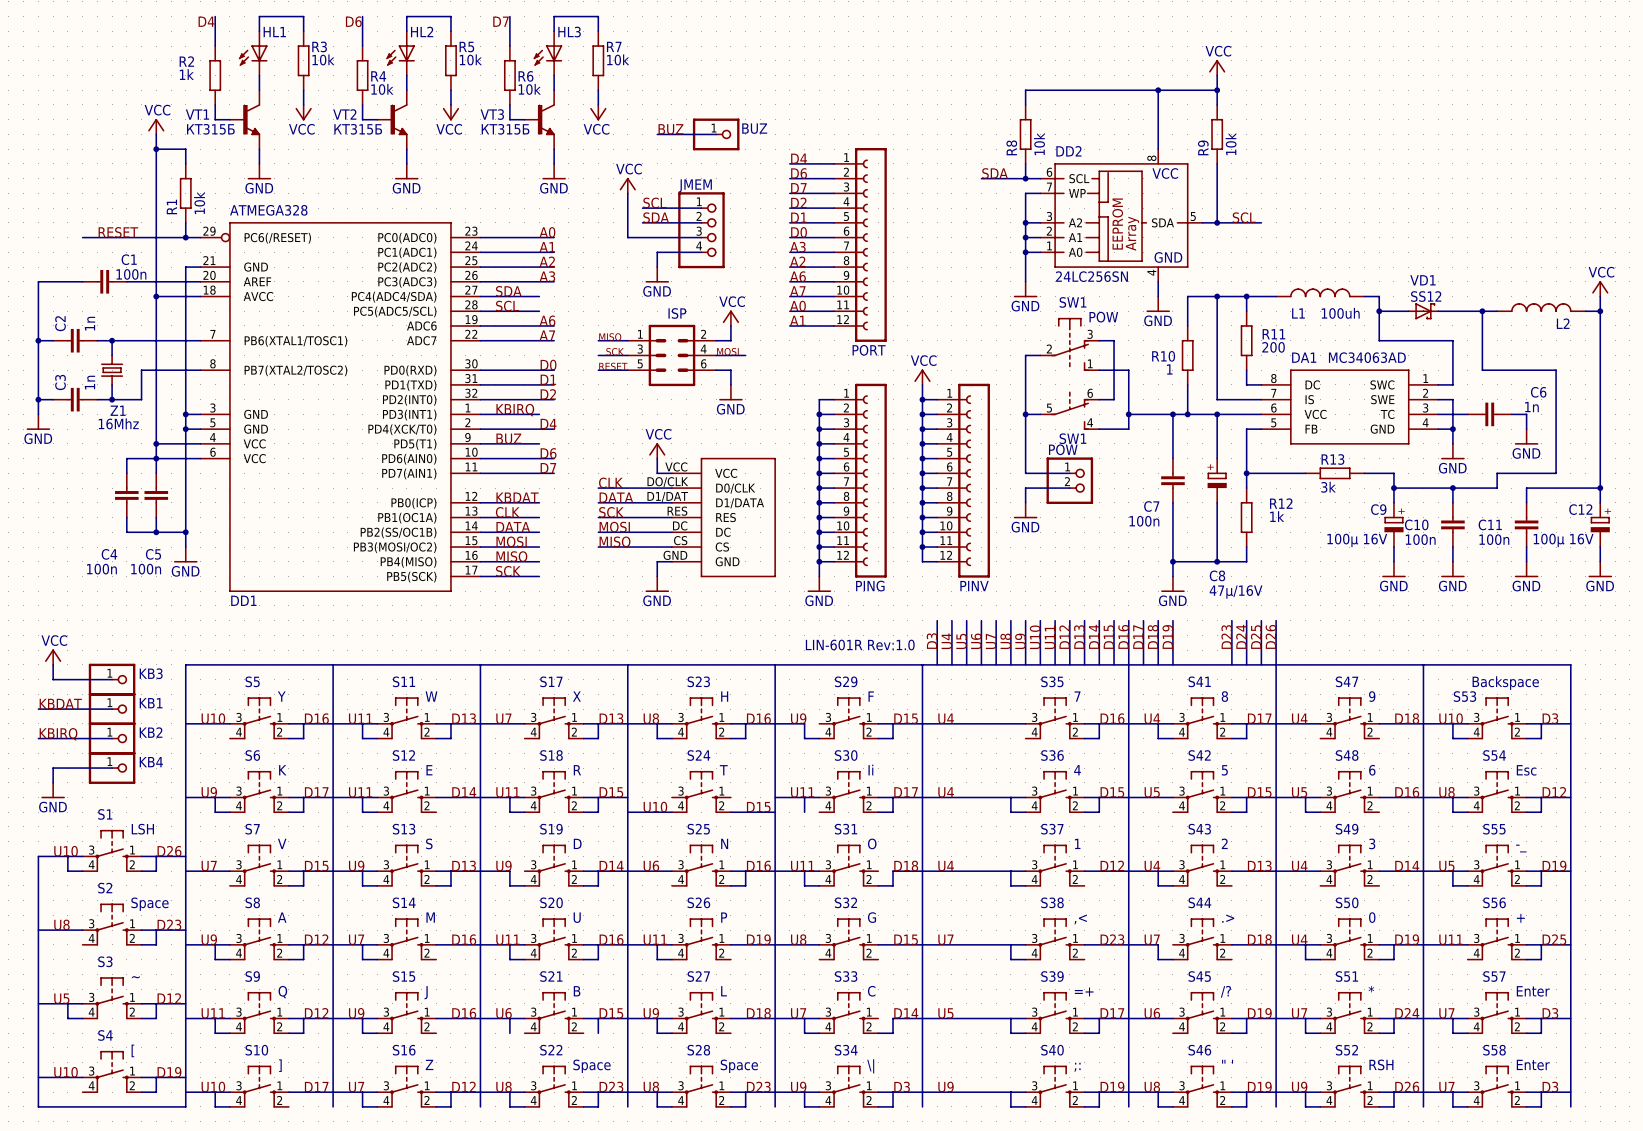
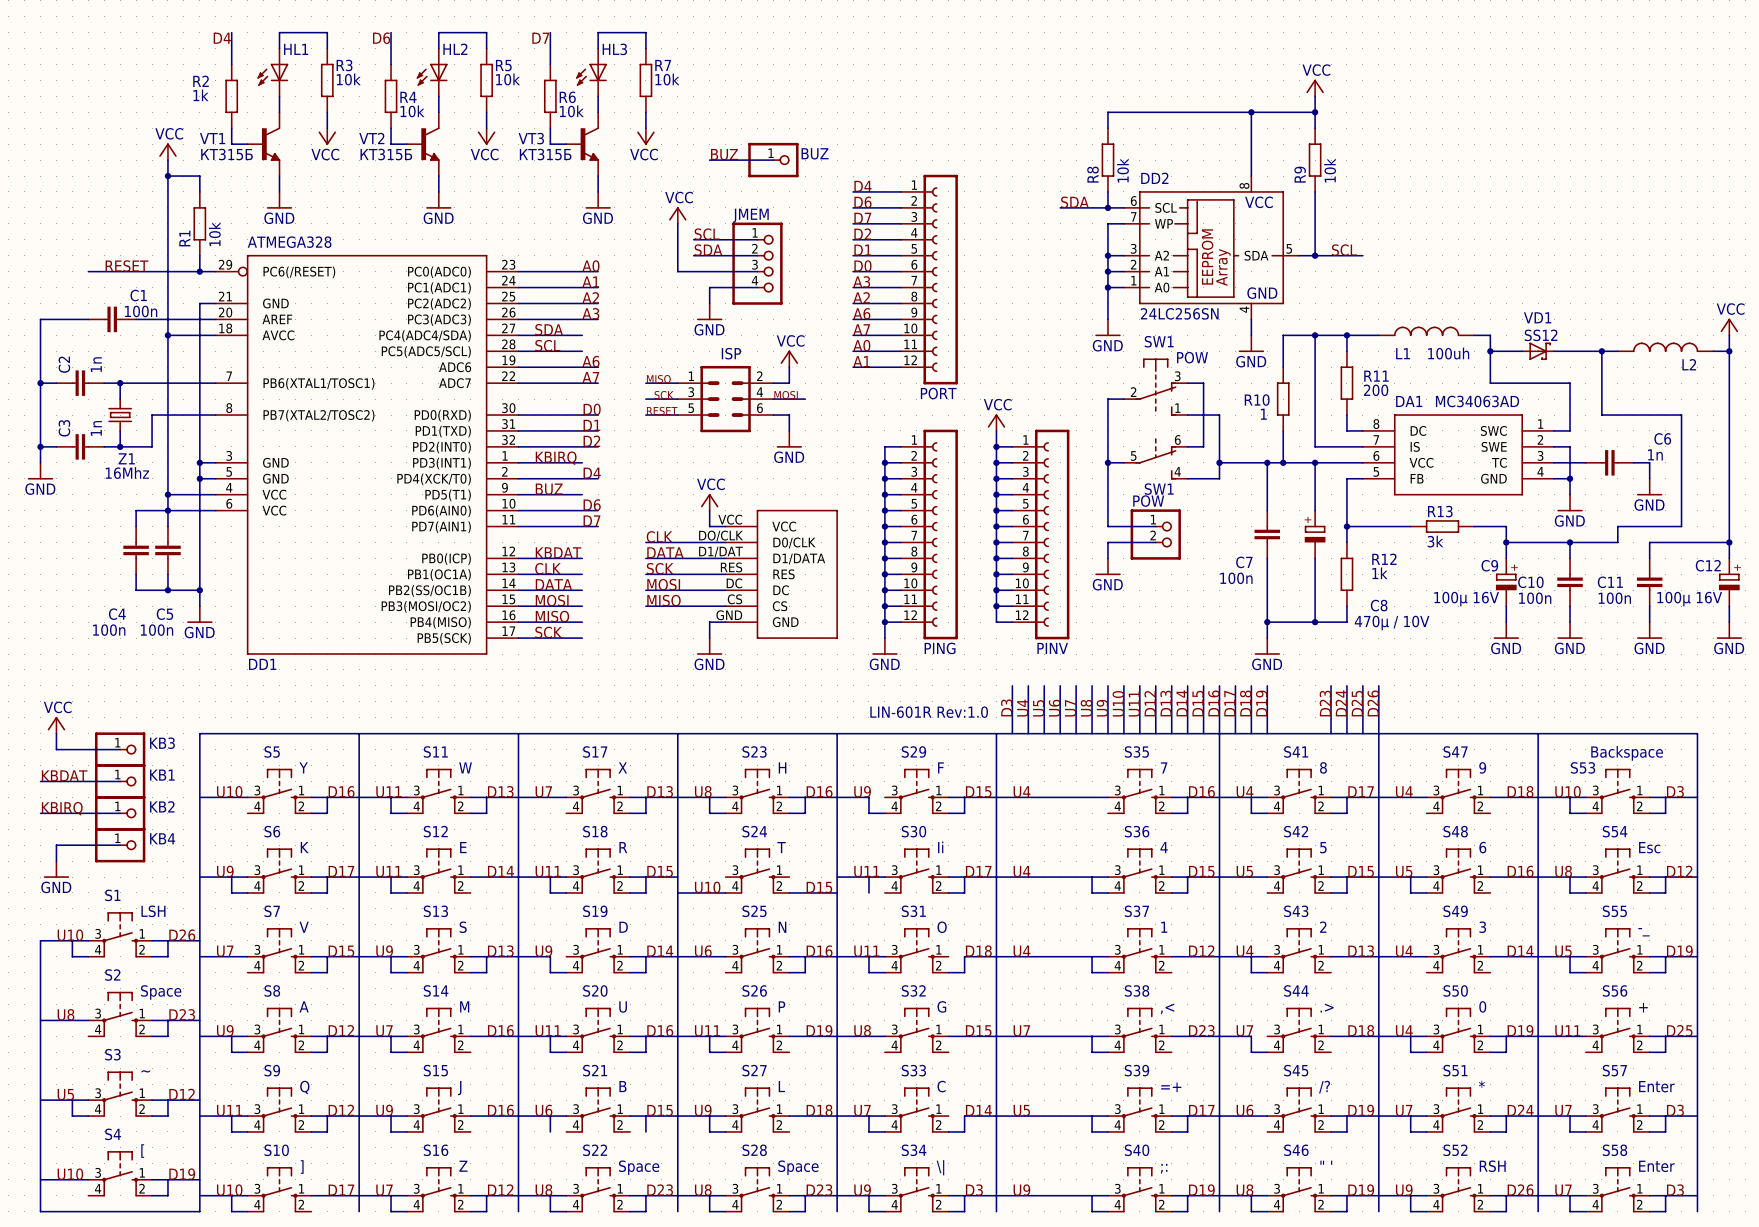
C8 name position: C8 (1217, 575) -> C8 (1379, 605)
C8 value: 47µ/16V (1236, 592) -> 470µ / 10V (1392, 622)

